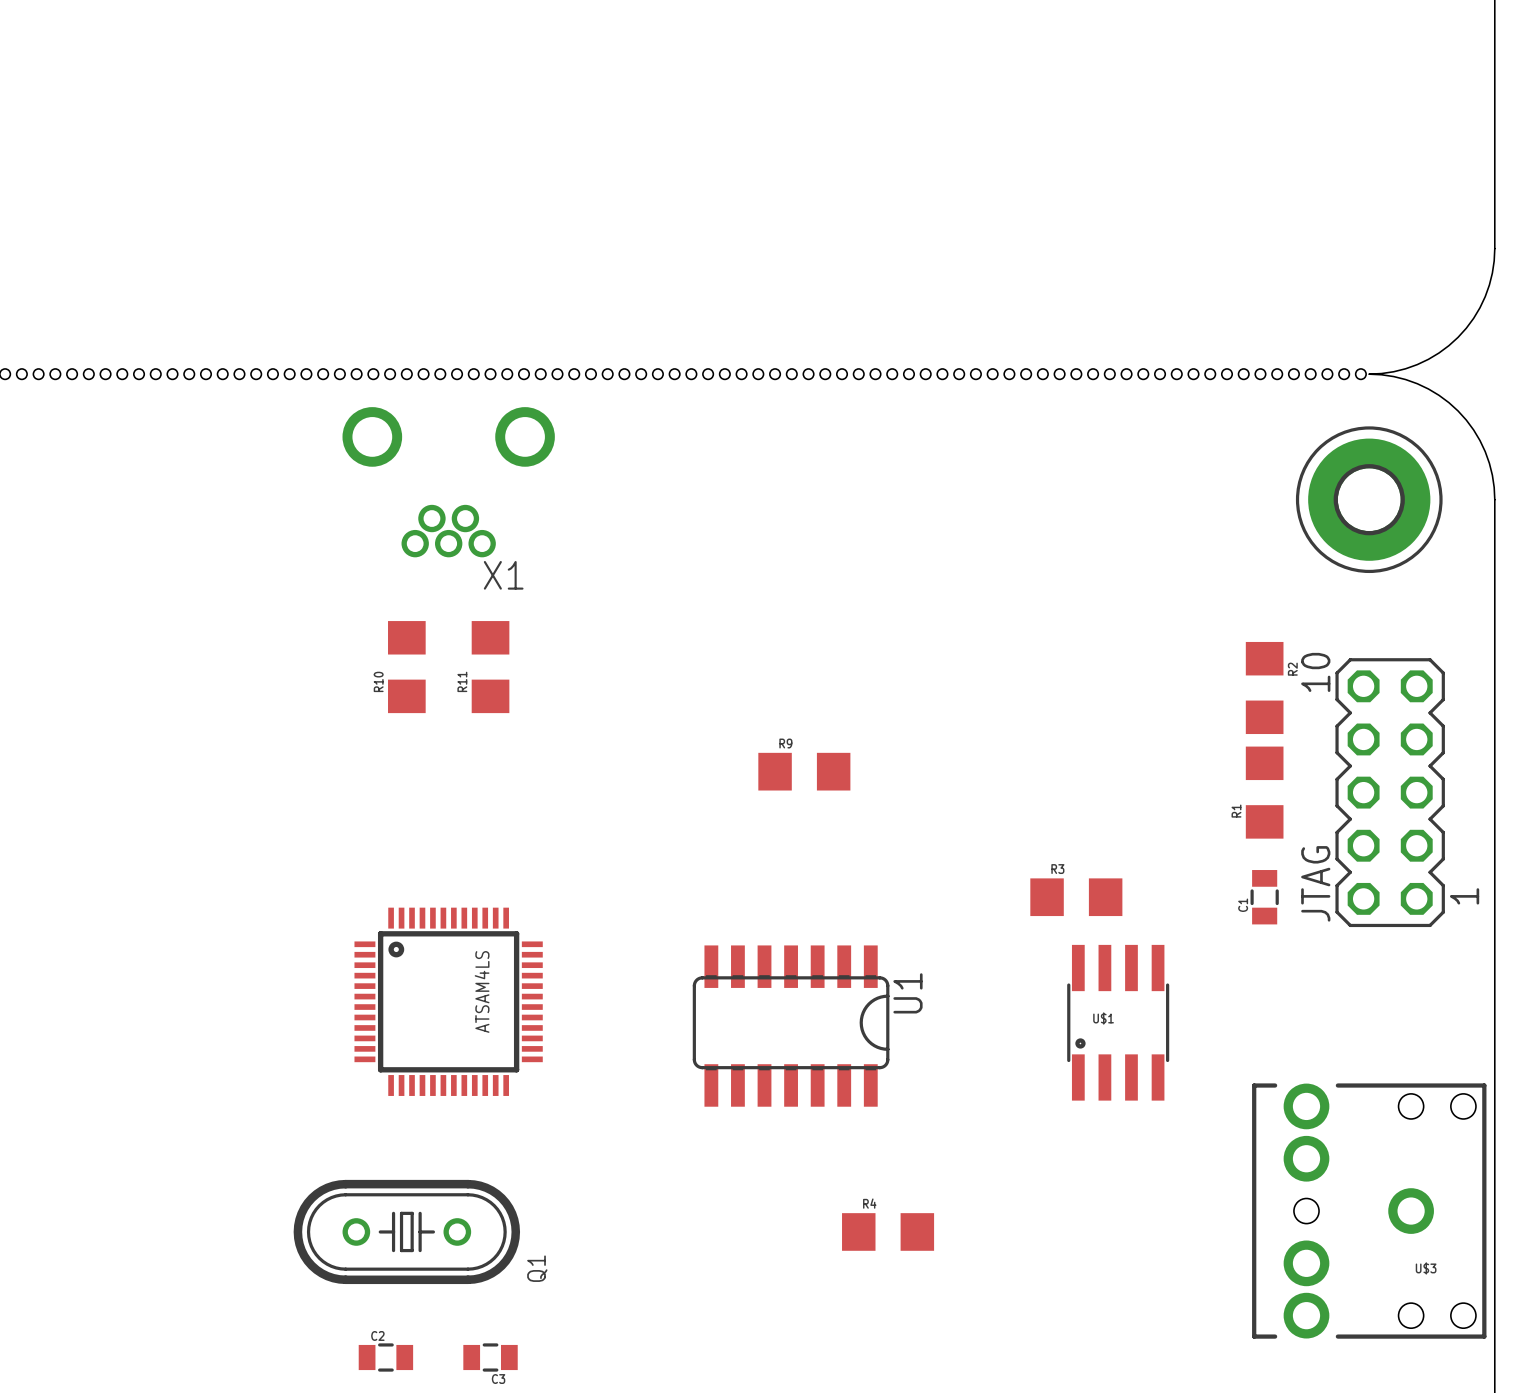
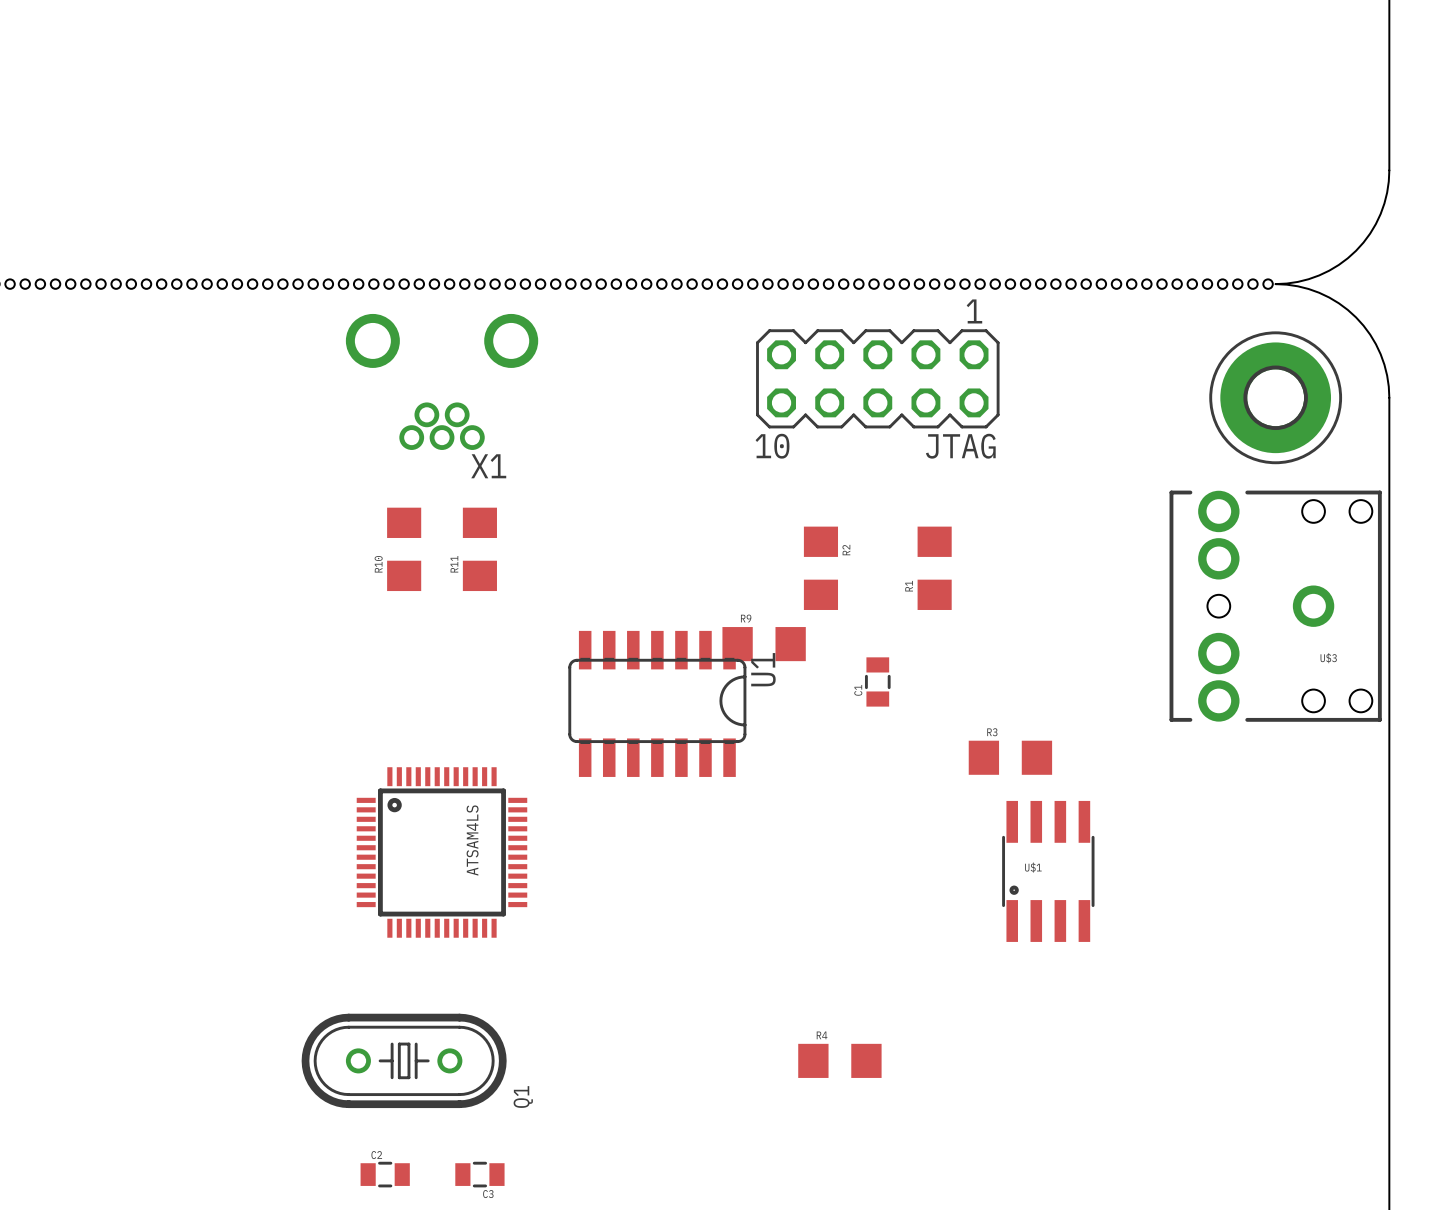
JTAG: none -> (877, 378)
R2 position: (1264, 687) -> (820, 568)
R1 position: (1264, 792) -> (934, 568)
JTAG: (1390, 792) -> none
C1 position: (1264, 897) -> (877, 681)
U1 position: (791, 1026) -> (657, 703)
U$3 position: (1369, 1211) -> (1275, 606)

